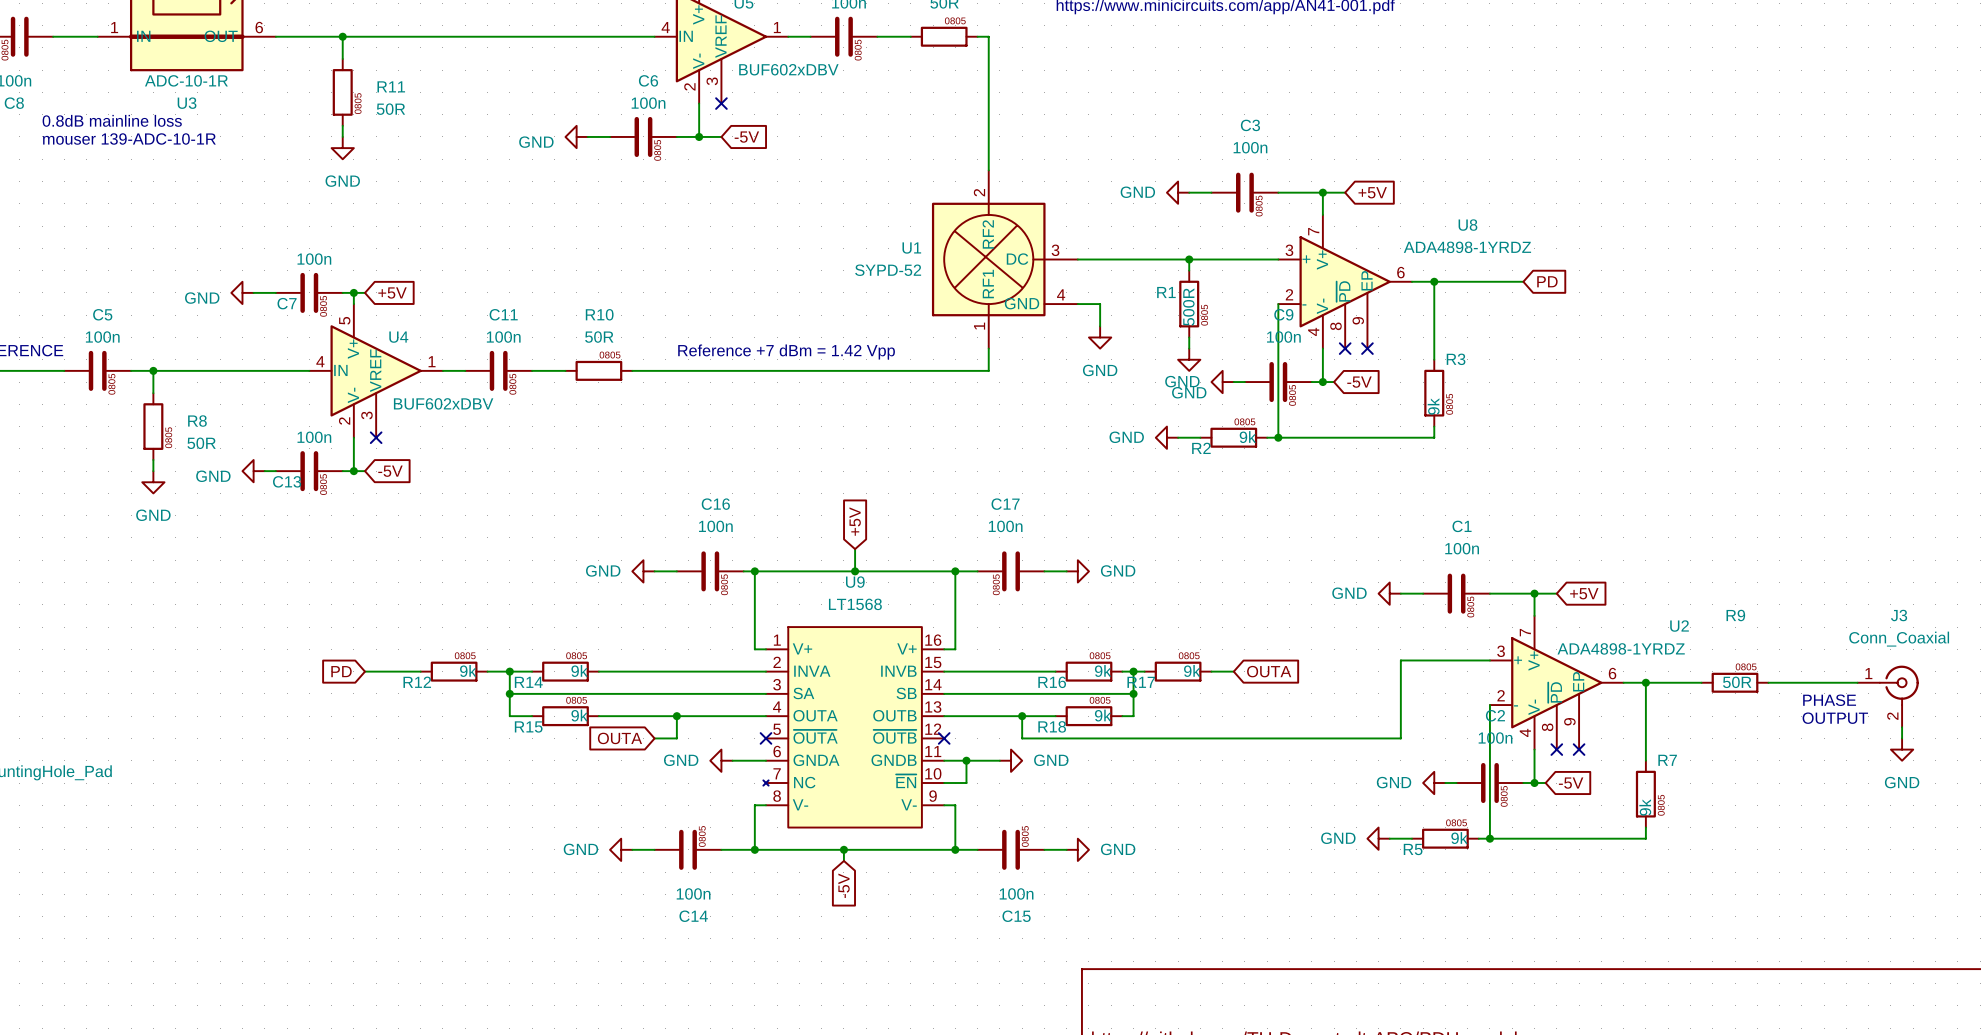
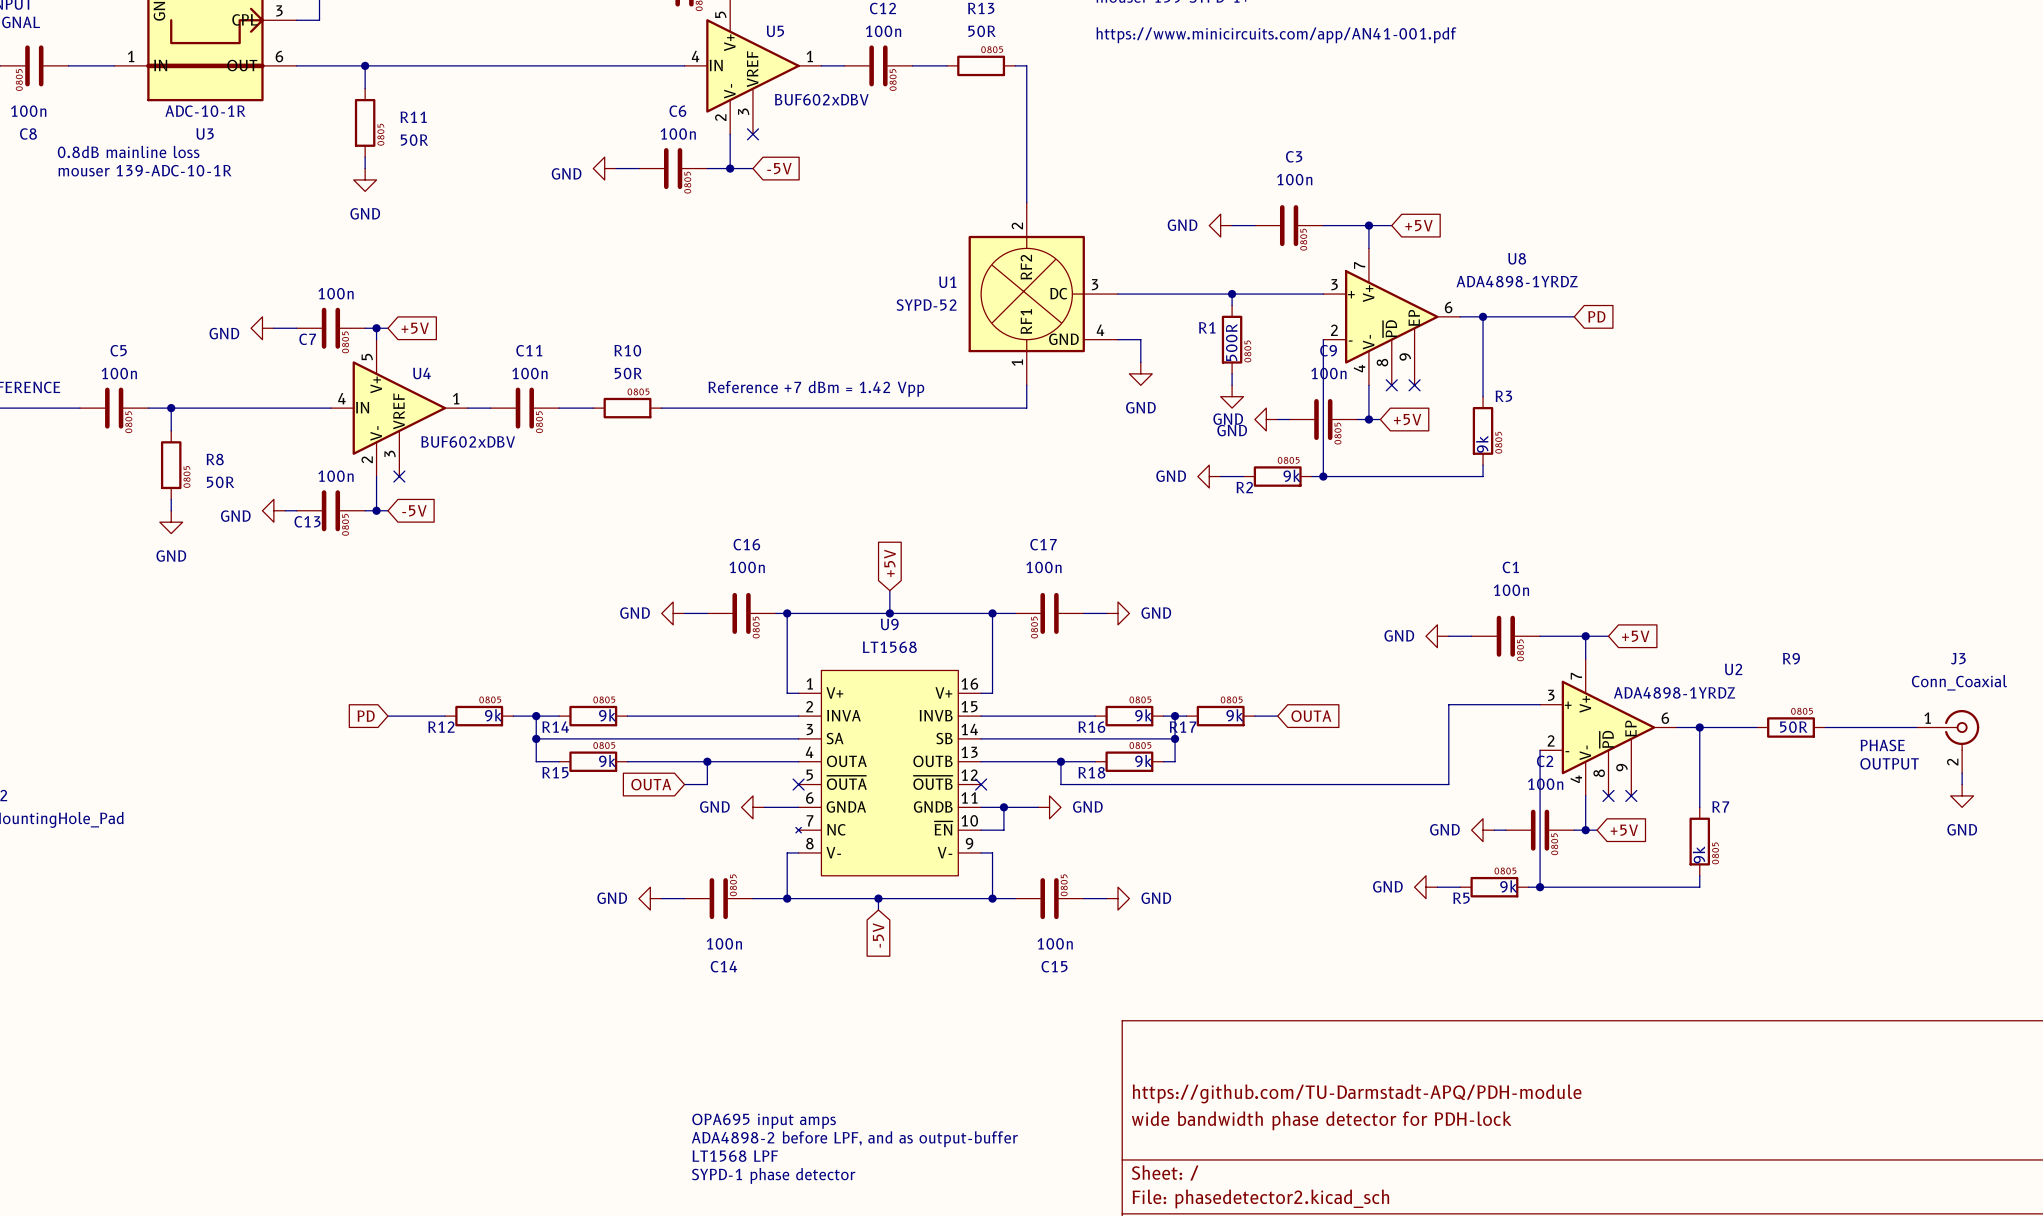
global label: -5V (1359, 382) -> +5V (1407, 419)
global label: -5V (1571, 783) -> +5V (1624, 830)

